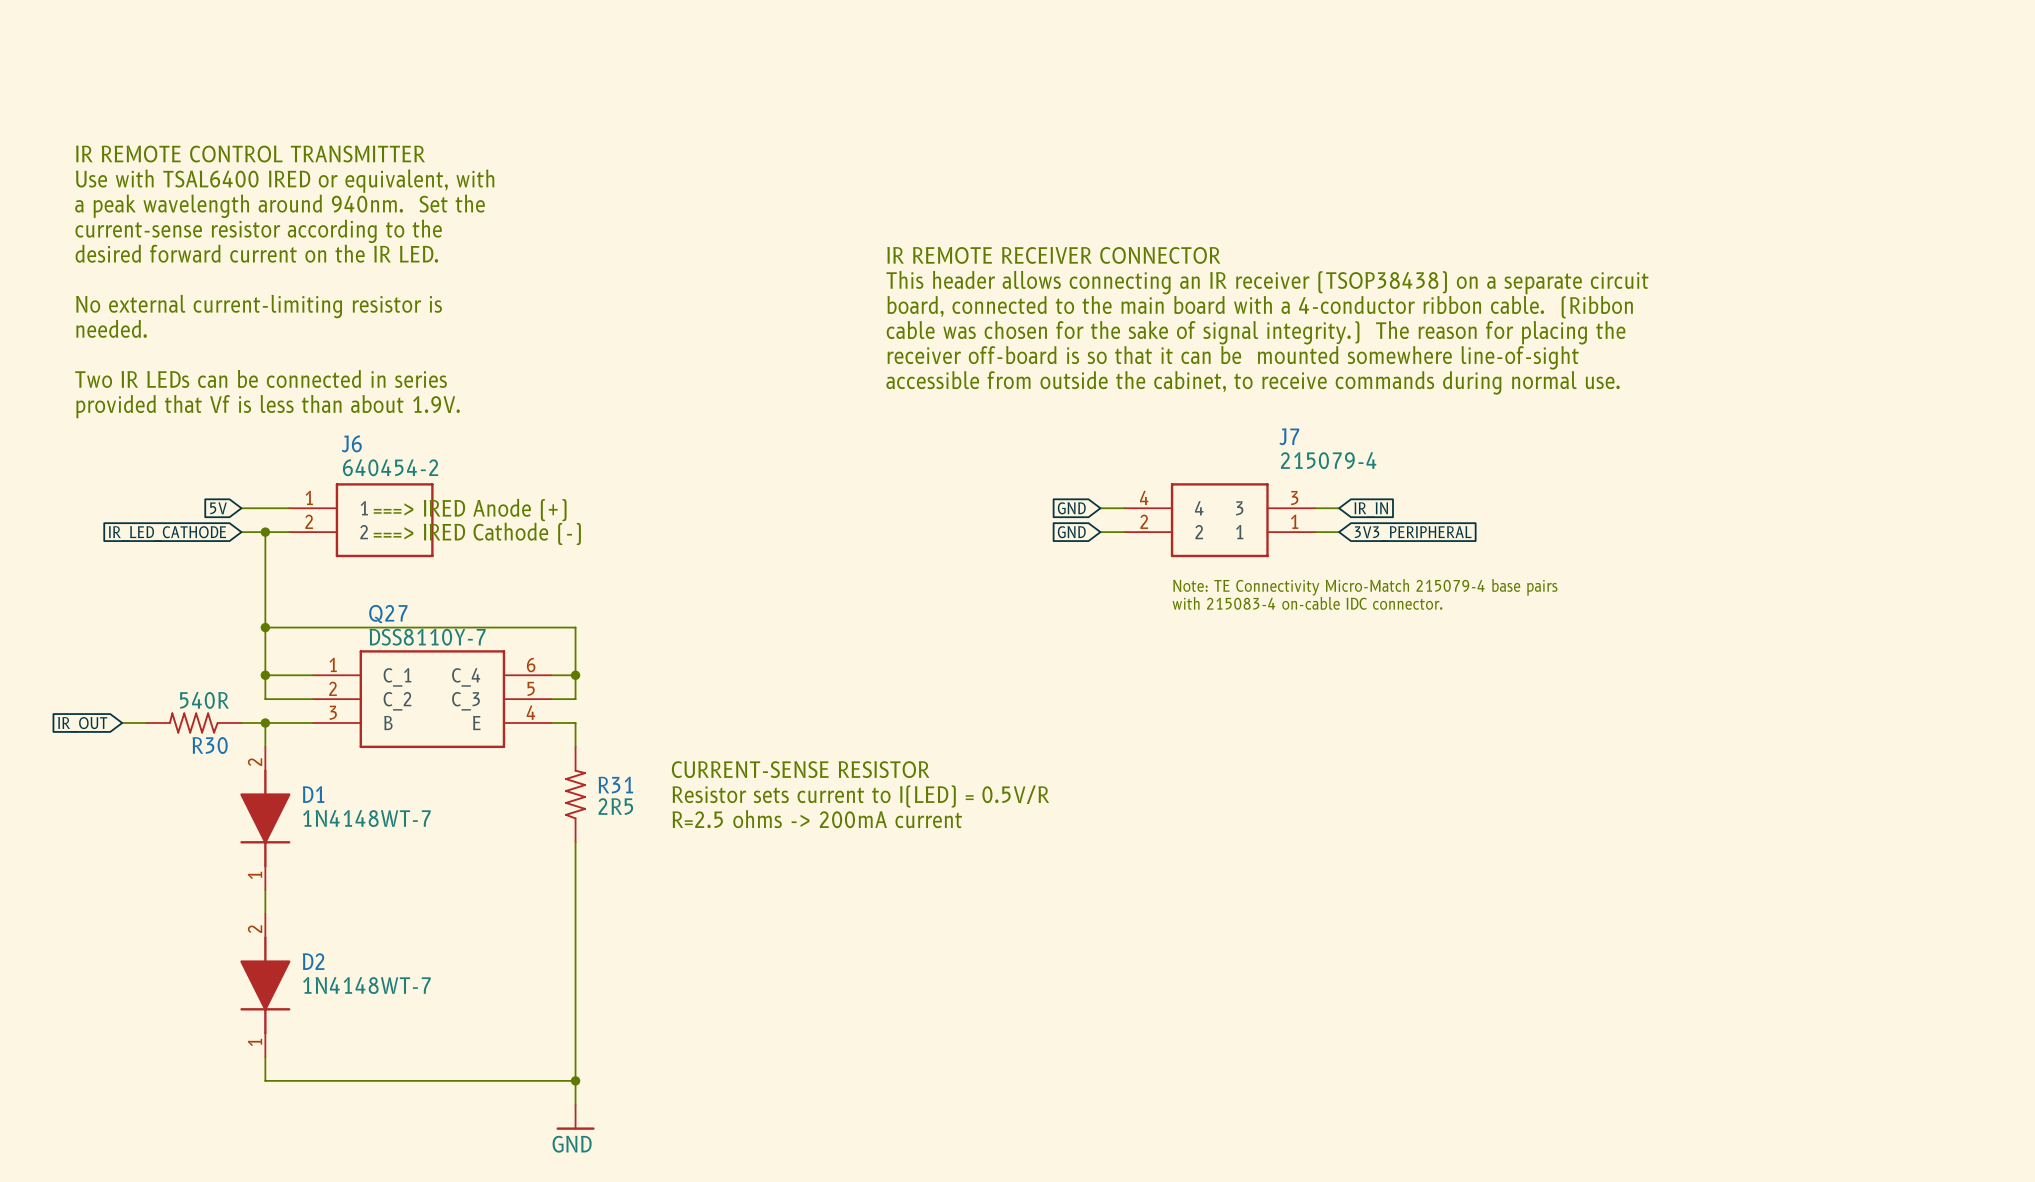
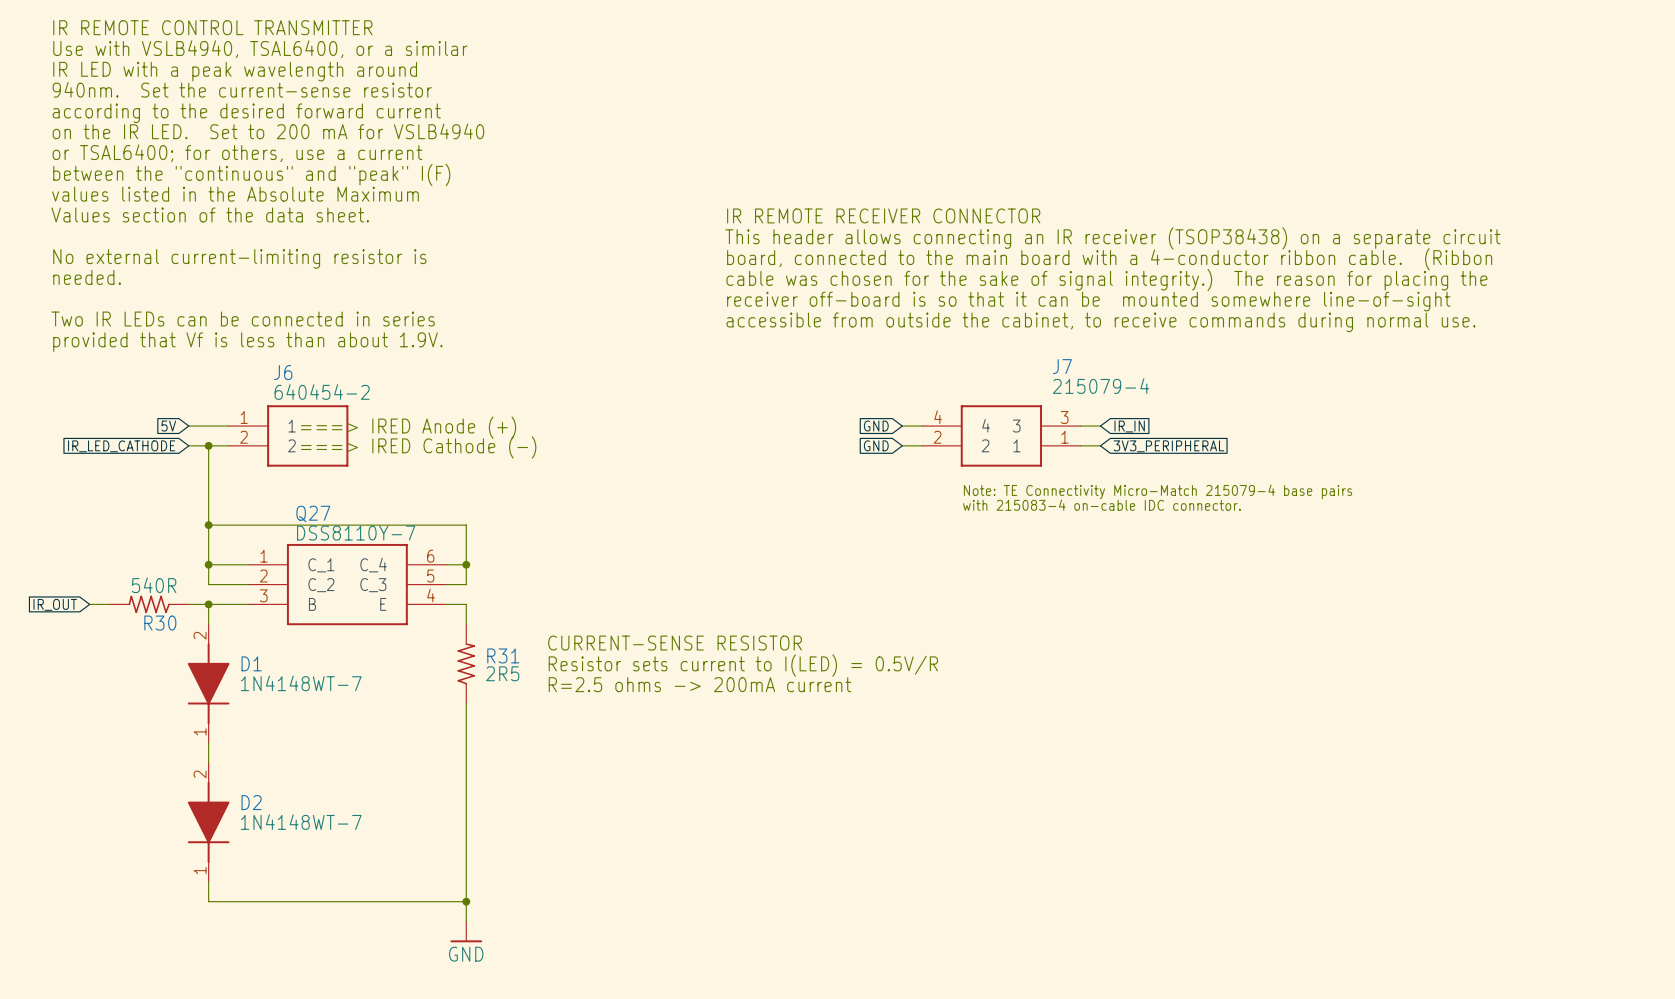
text: none -> IR REMOTE CONTROL TRANSMITTER (212, 27)
text: none -> Use with VSLB4940, TSAL6400, or a similar (260, 49)
text: none -> IR LED with a peak wavelength around (235, 71)
text: none -> 940nm. Set the current-sense resistor (242, 89)
text: none -> according to the desired forward current (246, 113)
text: IR REMOTE CONTROL TRANSMITTER (250, 154) -> on the IR LED. Set to 200 mA for VSLB4940 (268, 131)
text: Use with TSAL6400 IRED or equivalent, with (285, 181) -> or TSAL6400; for others, use a current (237, 153)
text: a peak wavelength around 940nm. Set the (279, 206) -> between the "continuous" and "peak" I(F) (251, 175)
text: current-sense resistor according to the (258, 231) -> values listed in the Absolute Maximum (235, 194)
text: desired forward current on the IR LED. (256, 253) -> Values section of the data sheet. (210, 214)

